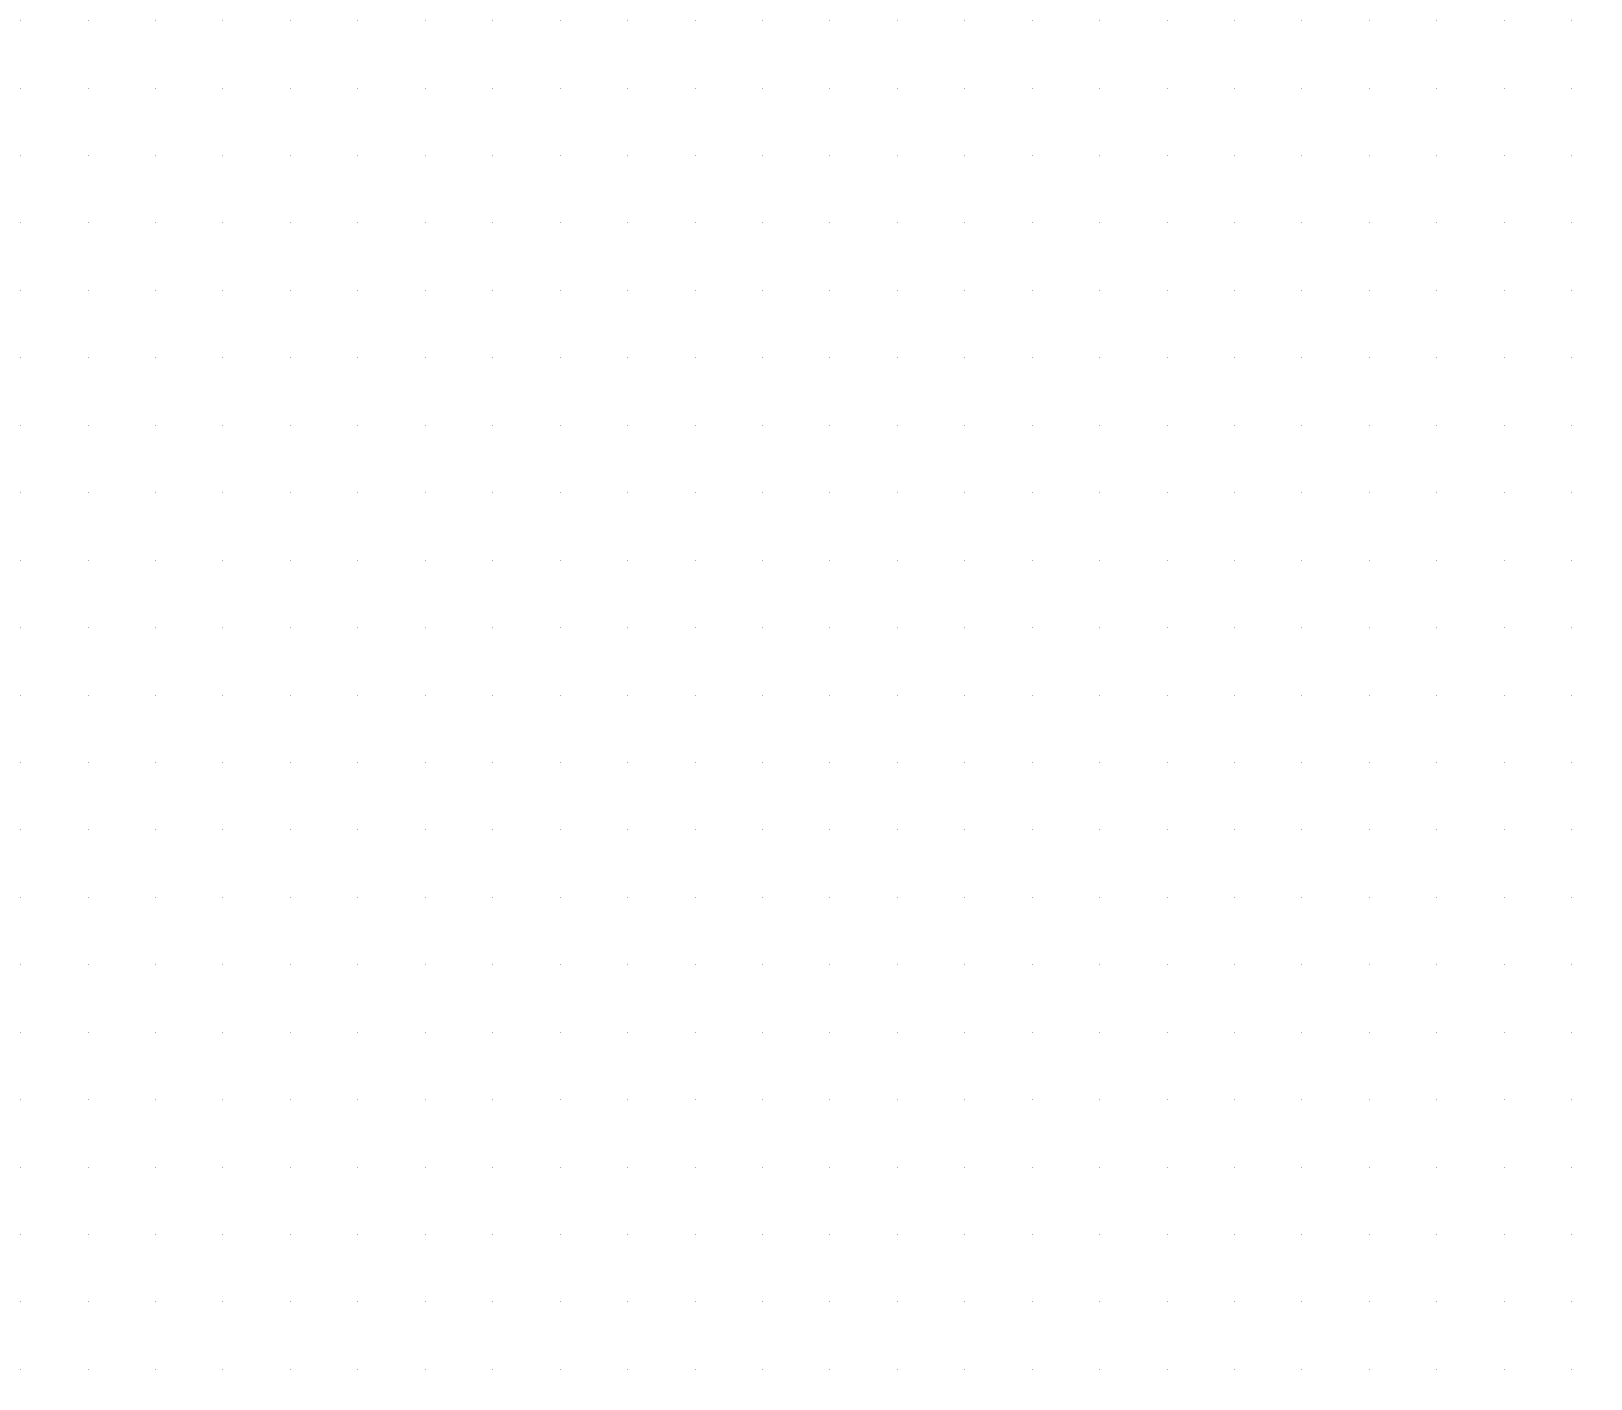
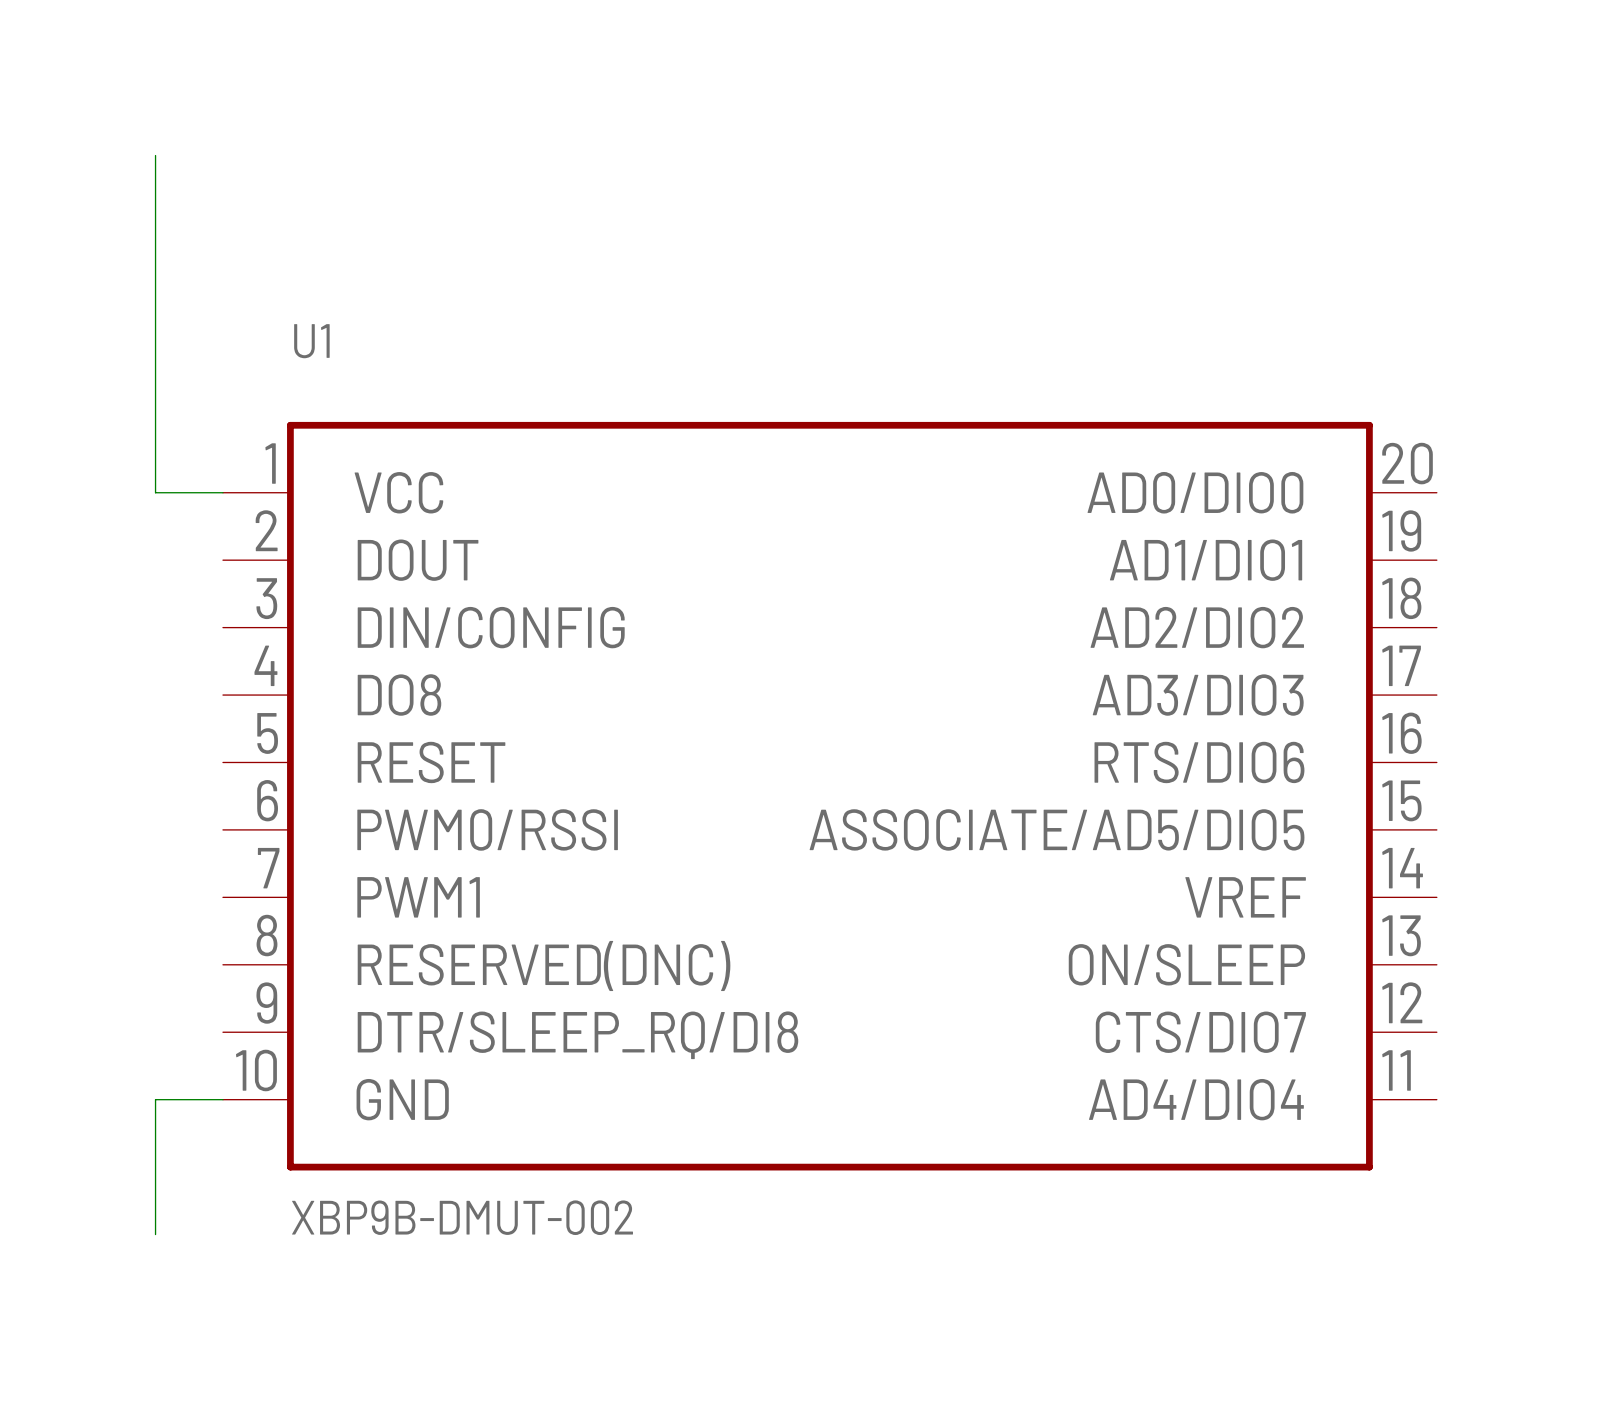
wire: none -> (155, 155) (155, 492) (222, 492)
U1: none -> XBP9B-DMUT-002 (829, 796)
wire: none -> (222, 1099) (155, 1099) (155, 1234)

